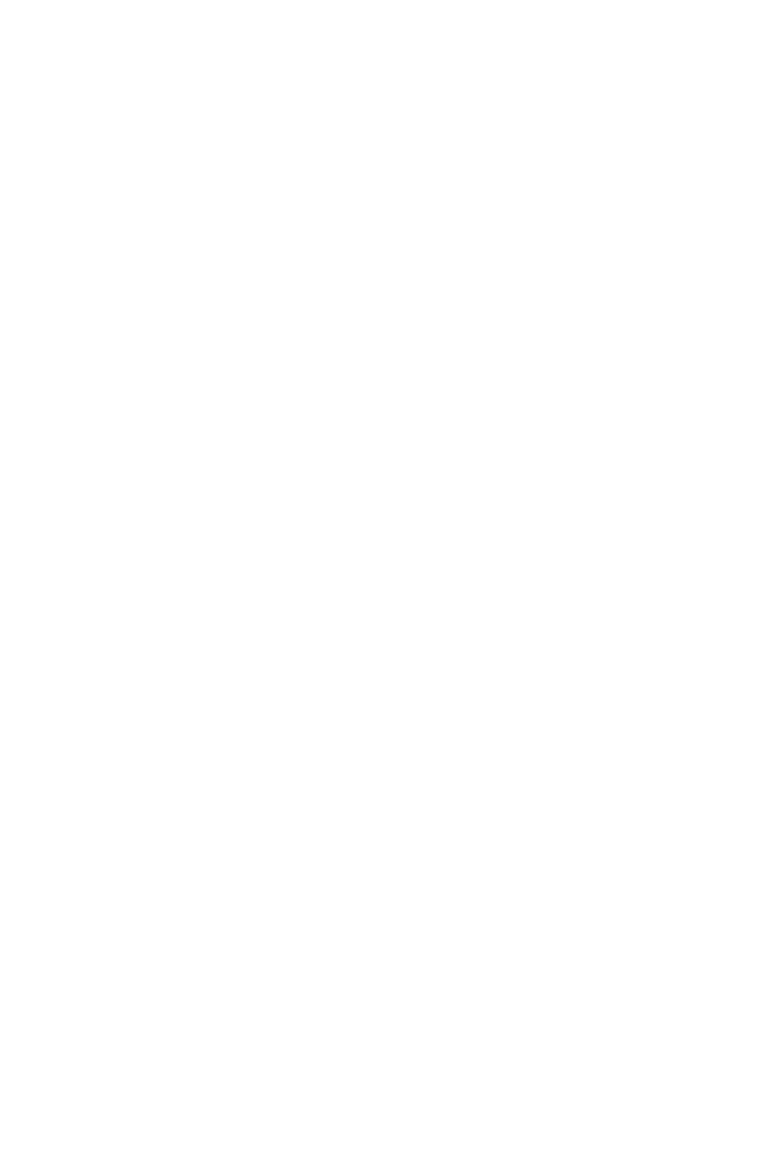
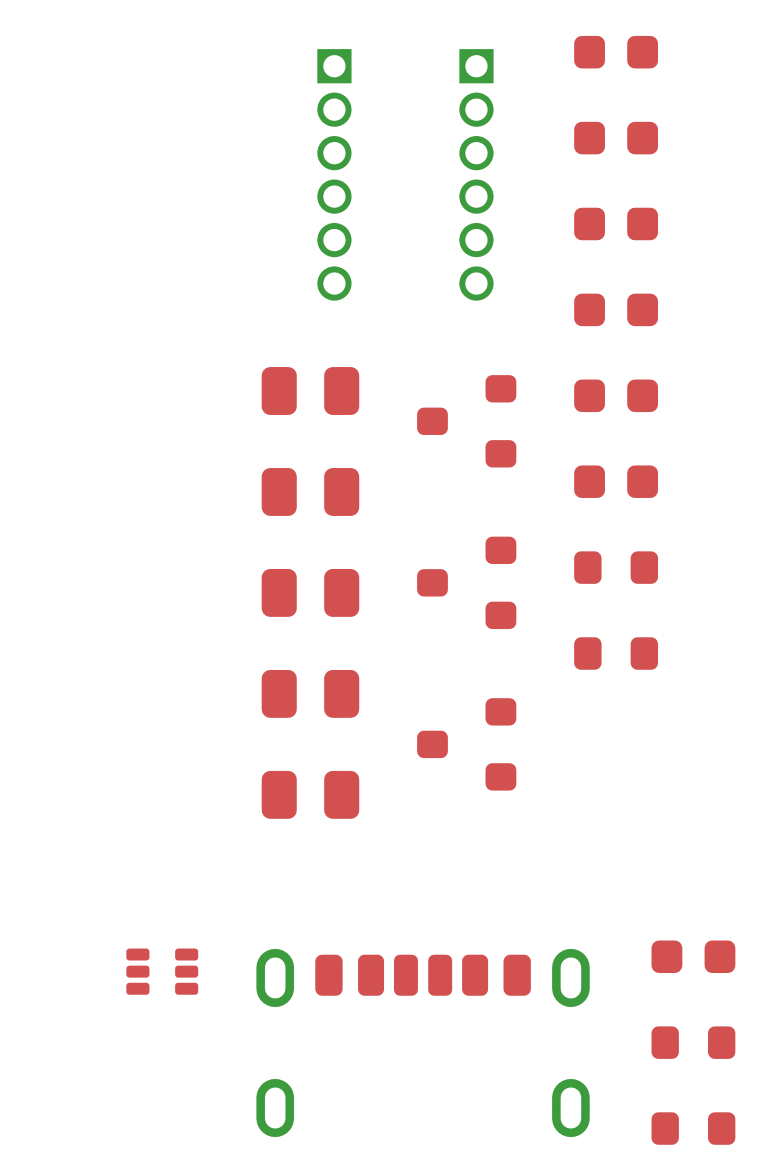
part: none -> (616, 52)
part: none -> (616, 138)
part: none -> (334, 174)
part: none -> (476, 174)
part: none -> (616, 223)
part: none -> (616, 309)
part: none -> (310, 391)
part: none -> (616, 395)
part: none -> (466, 421)
part: none -> (616, 481)
part: none -> (310, 491)
part: none -> (616, 567)
part: none -> (466, 582)
part: none -> (310, 592)
part: none -> (616, 653)
part: none -> (310, 693)
part: none -> (466, 744)
part: none -> (310, 794)
part: none -> (693, 956)
part: none -> (162, 971)
part: none -> (423, 1042)
part: none -> (693, 1042)
part: none -> (693, 1128)

